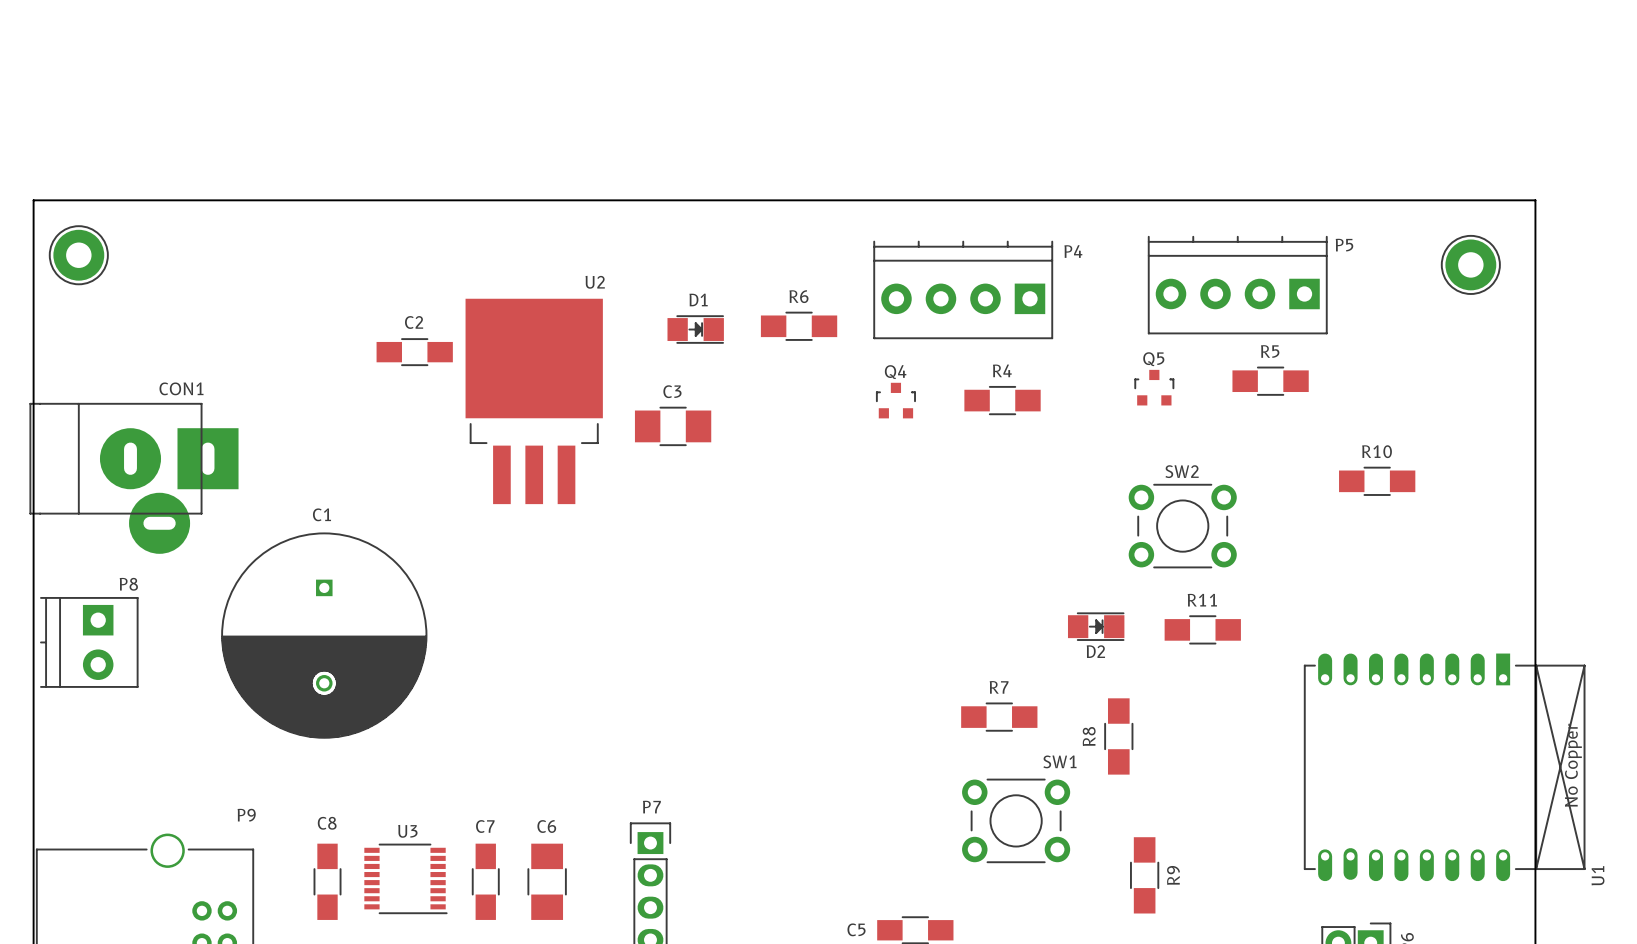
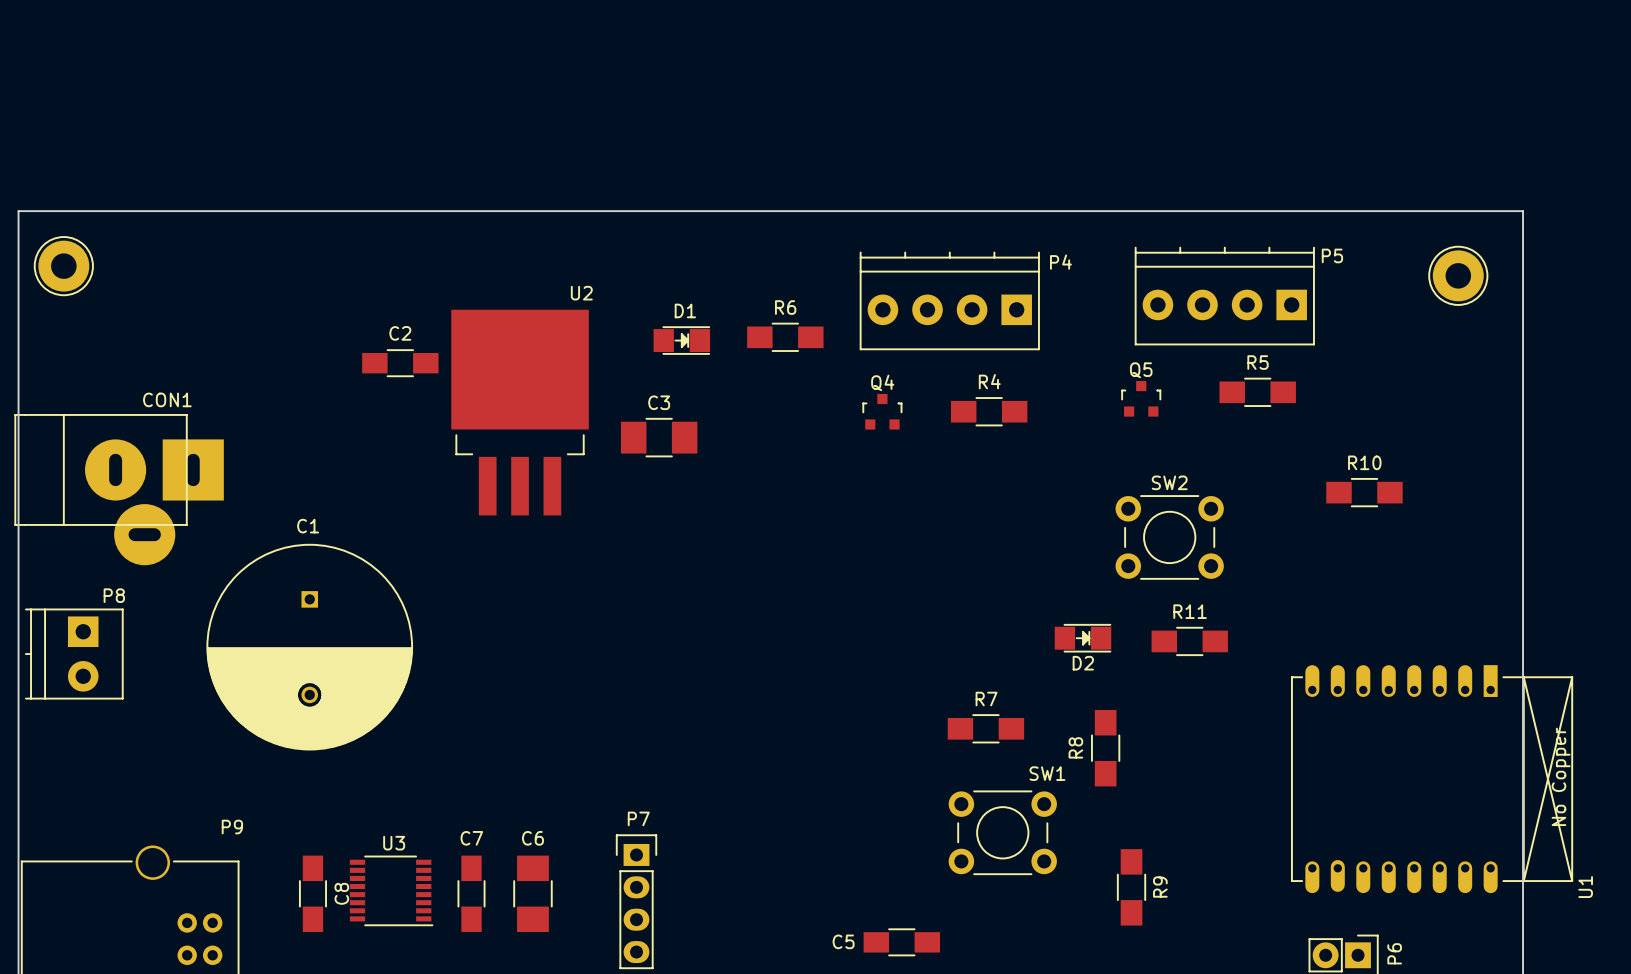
C8 name rotation: 0° (327, 823) -> 90° counterclockwise (341, 893)
C8 name position: C8 (327, 823) -> C8 (341, 893)

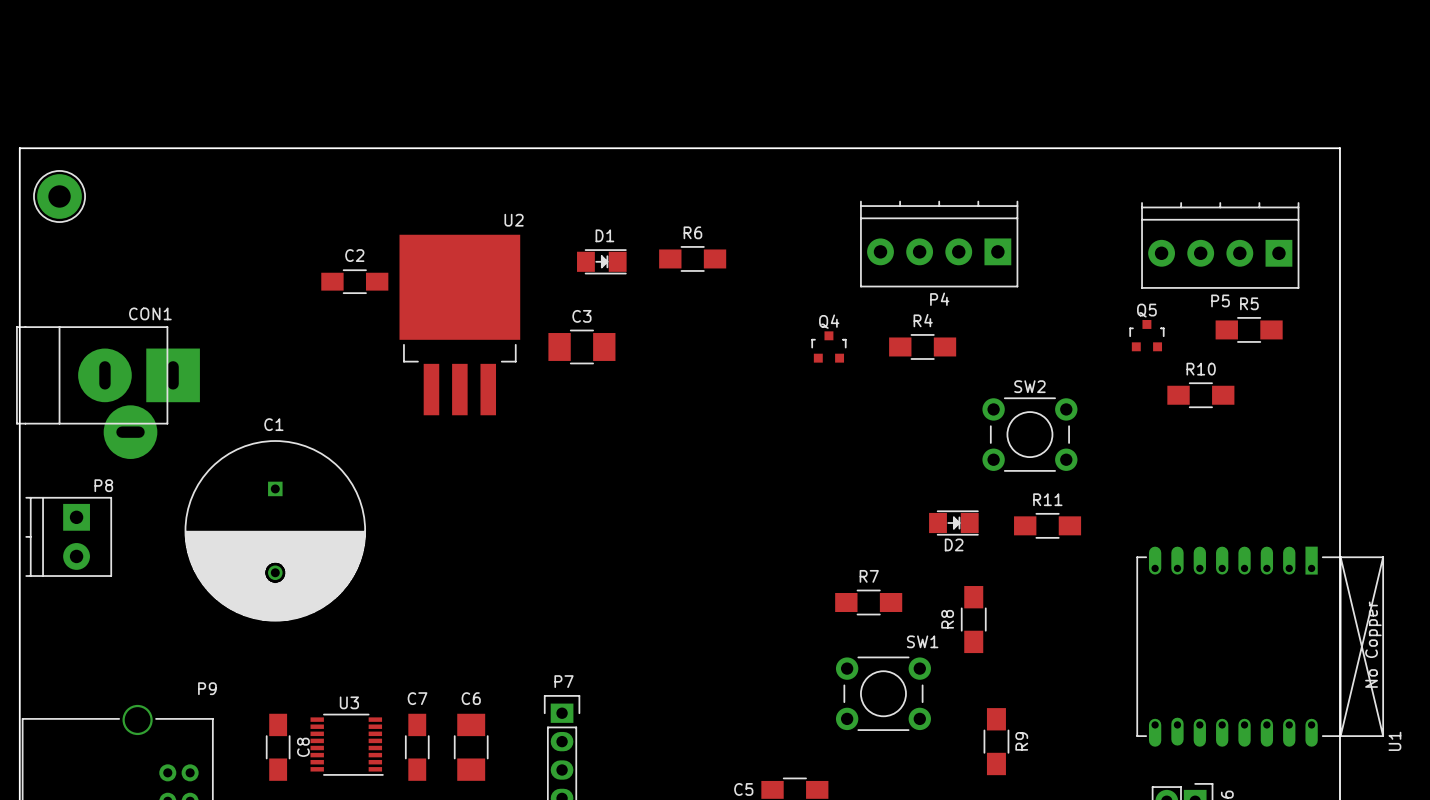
P5 name position: P5 (1332, 255) -> P5 (1220, 300)
P4 name position: P4 (1060, 262) -> P4 (939, 299)
part: (1458, 275) -> none
P5 position: (1224, 296) -> (1220, 245)
P4 position: (949, 300) -> (939, 244)
R5 position: (1257, 392) -> (1249, 329)
Q5 position: (1141, 398) -> (1146, 335)
Q4 position: (882, 411) -> (828, 346)
R4 position: (989, 411) -> (922, 346)

